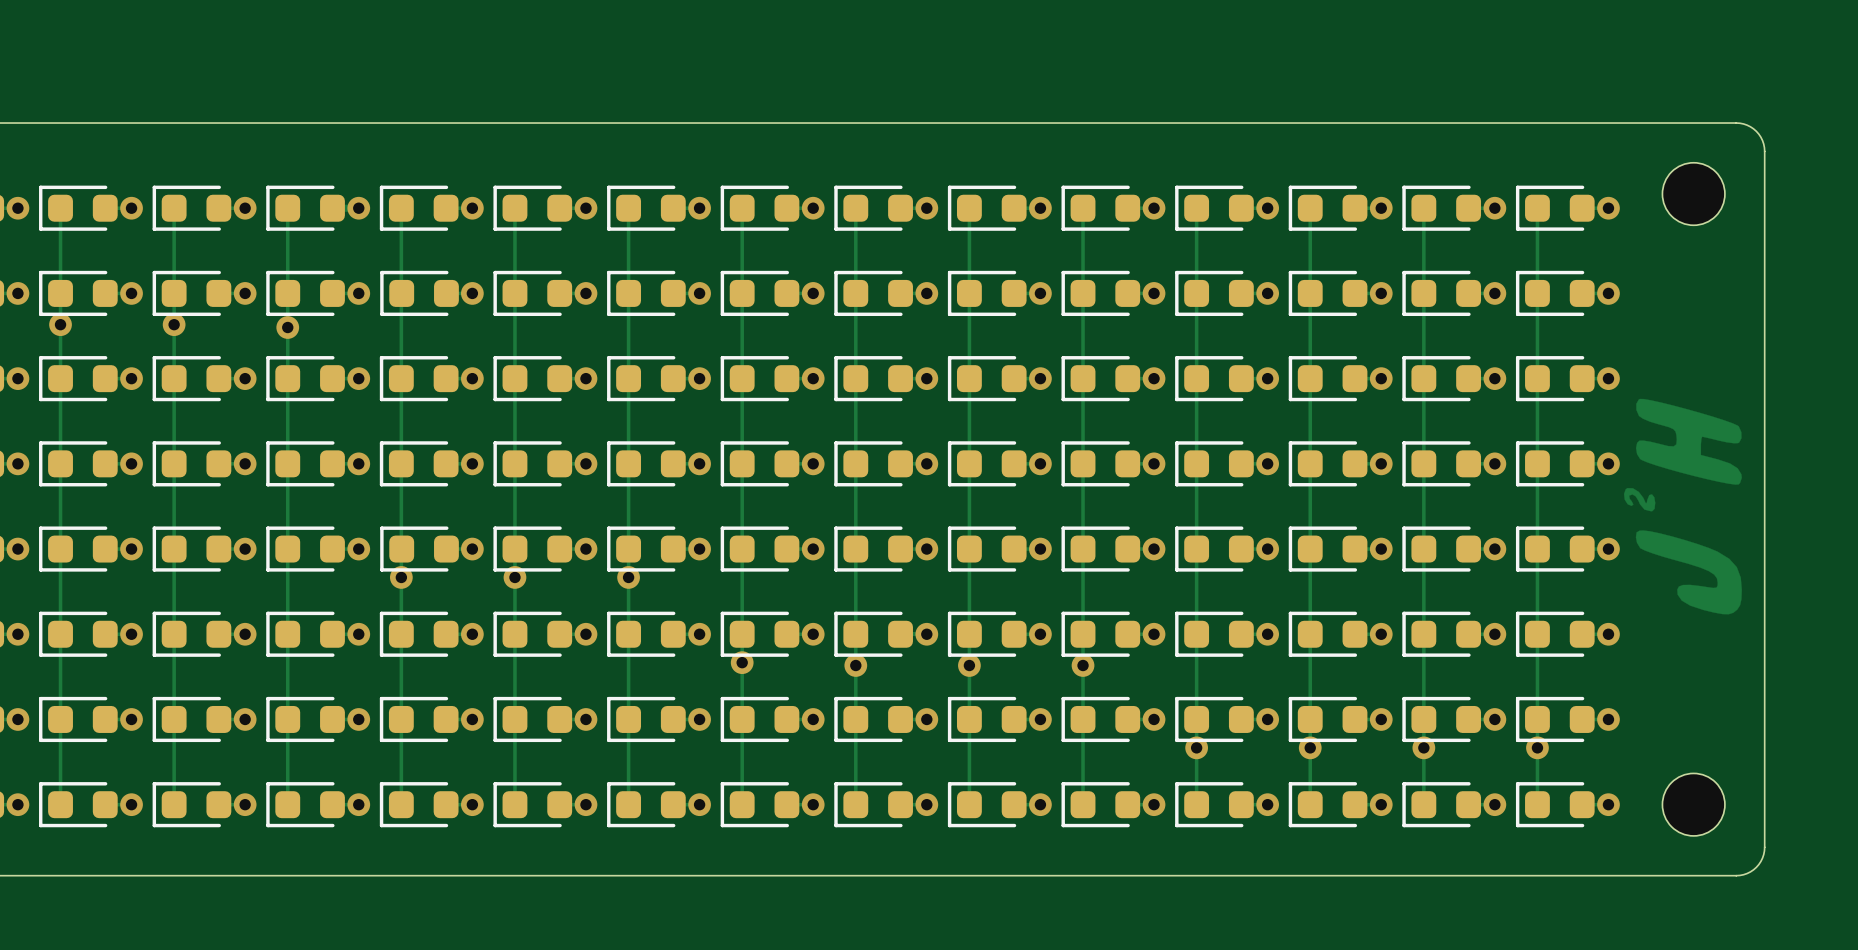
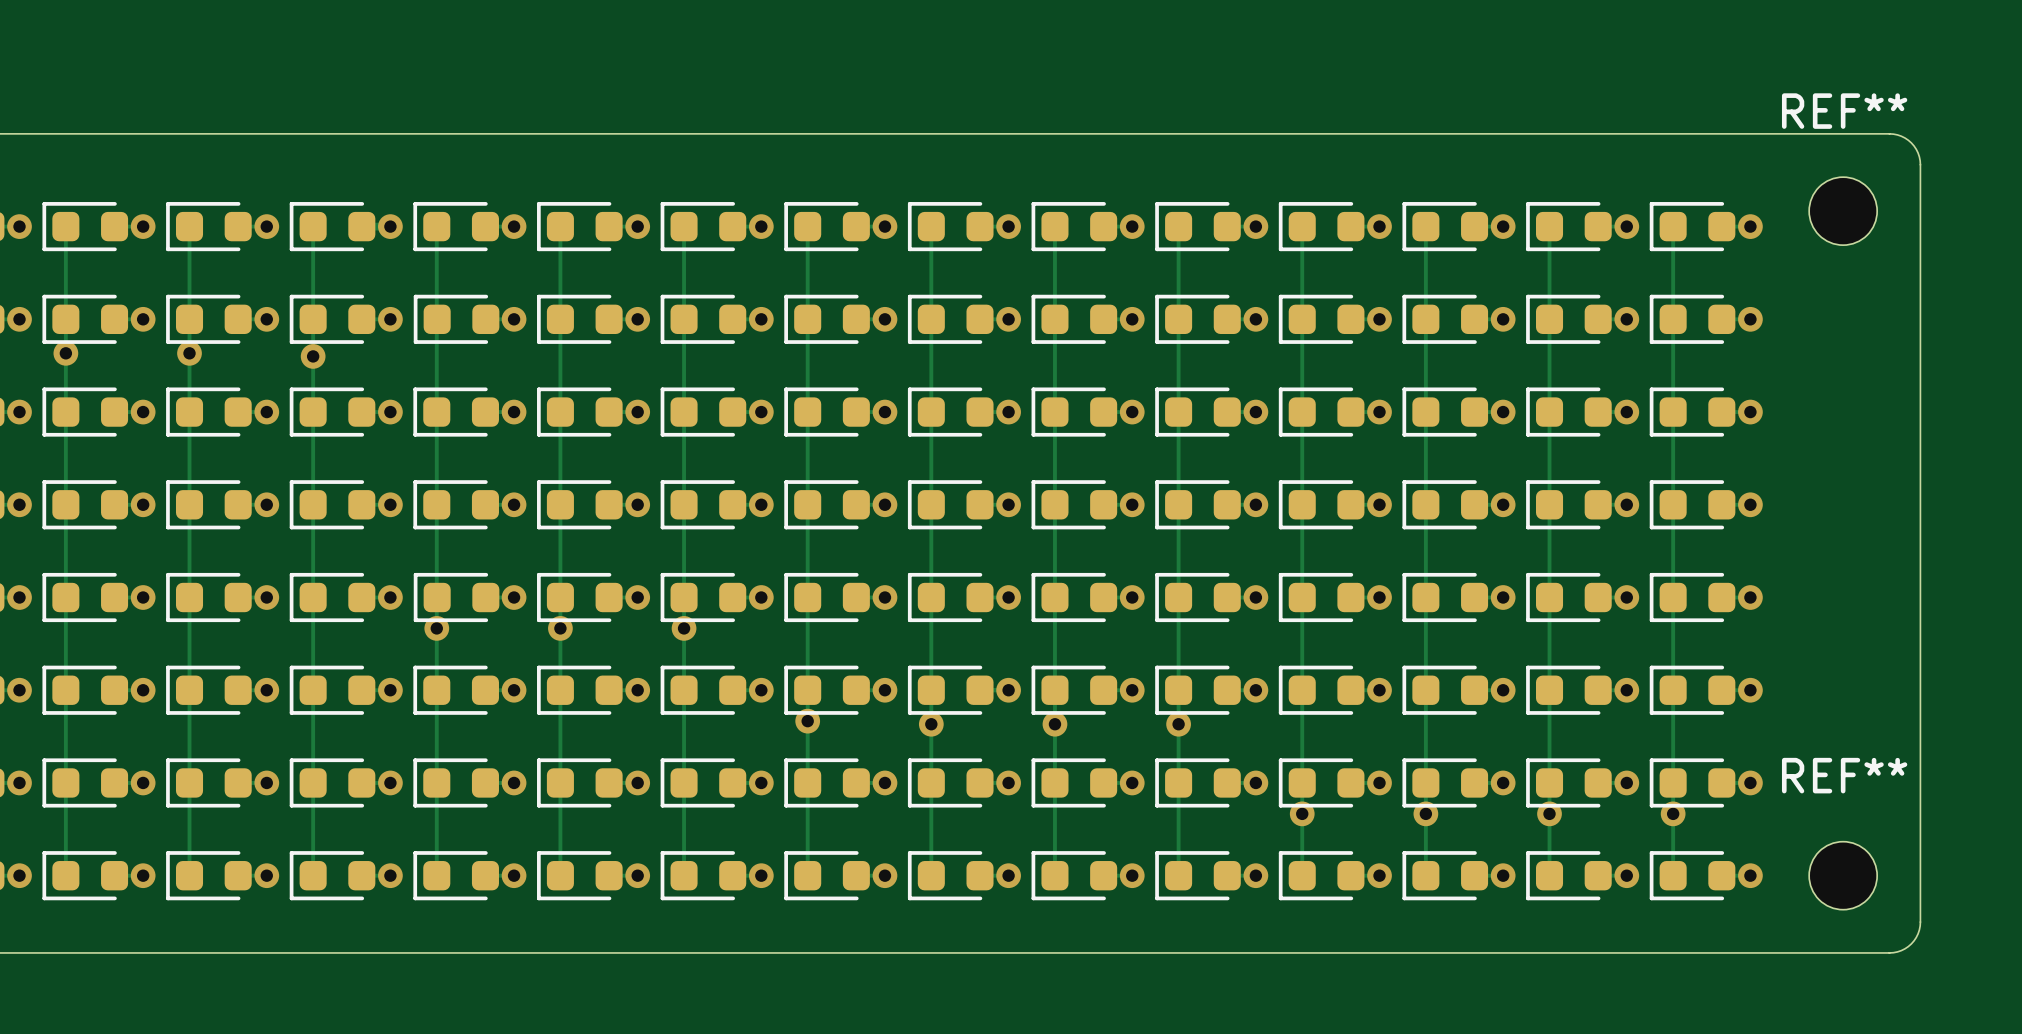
REF** name: none -> REF** (1844, 111)
drawing: [1623, 398, 1742, 615] -> none
REF** name: none -> REF** (1844, 775)

